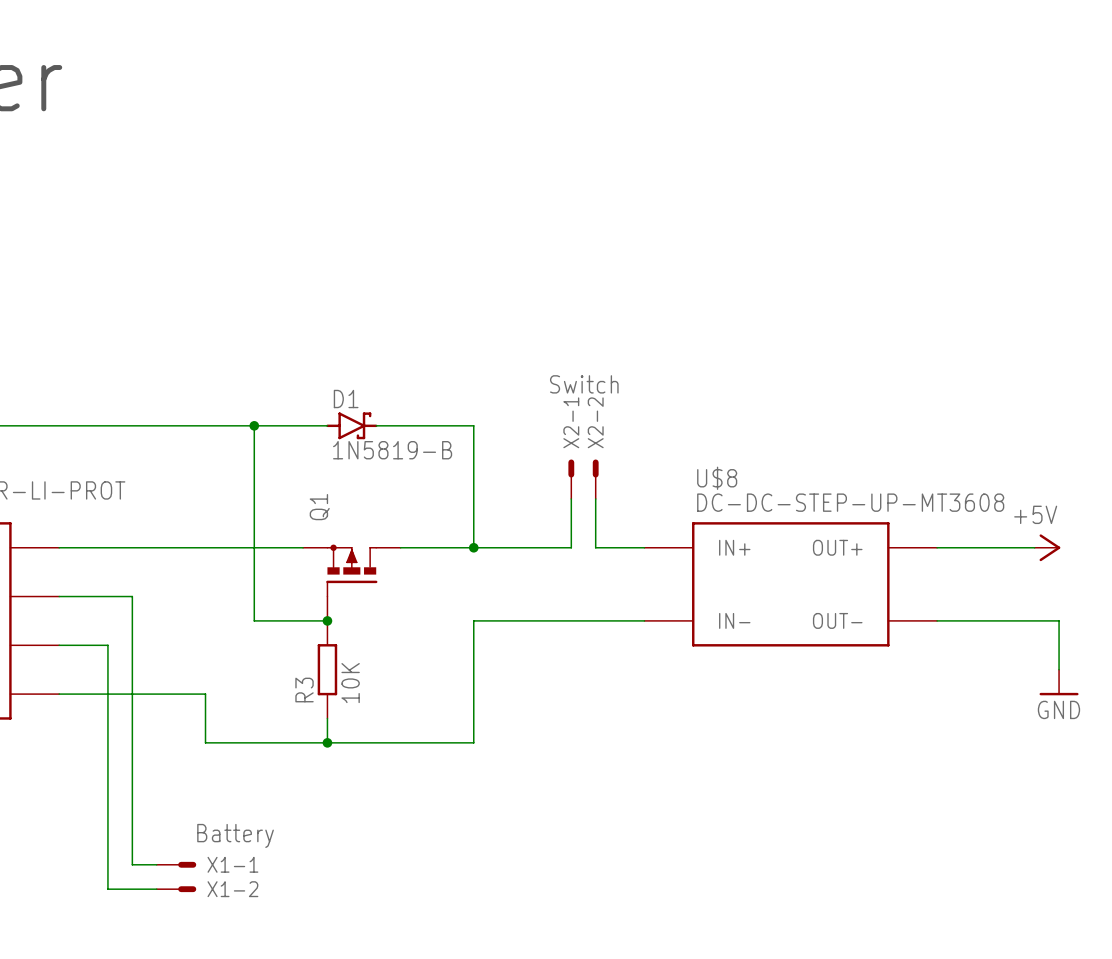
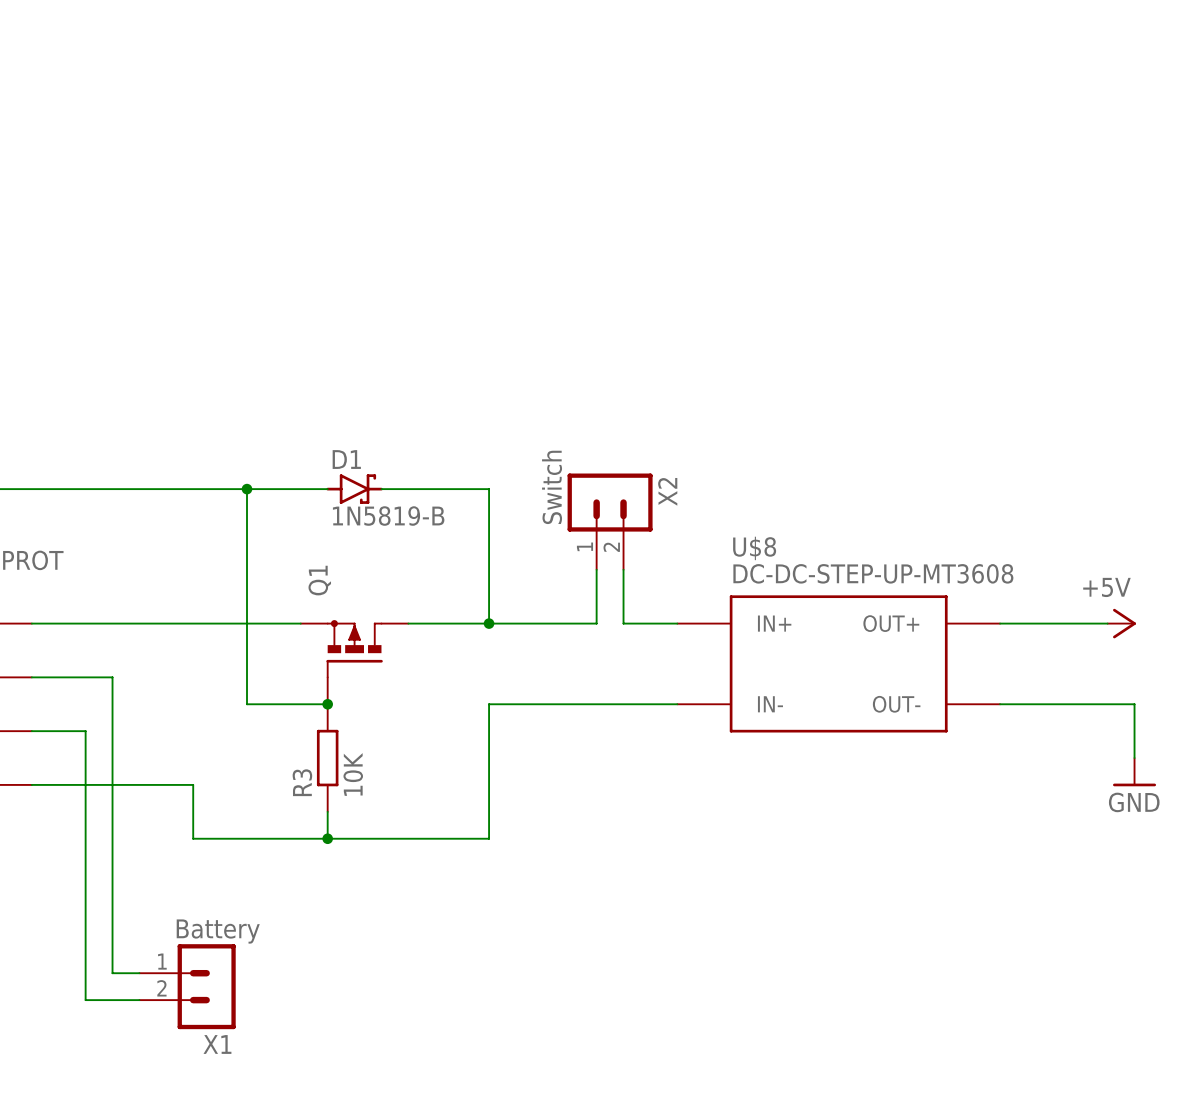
X2: none -> Switch (610, 521)
X2-1: Switch (571, 479) -> none
X2-2: (595, 479) -> none
X1-1: Battery (176, 864) -> none
X1: none -> Battery (187, 986)
X1-2: (176, 889) -> none

